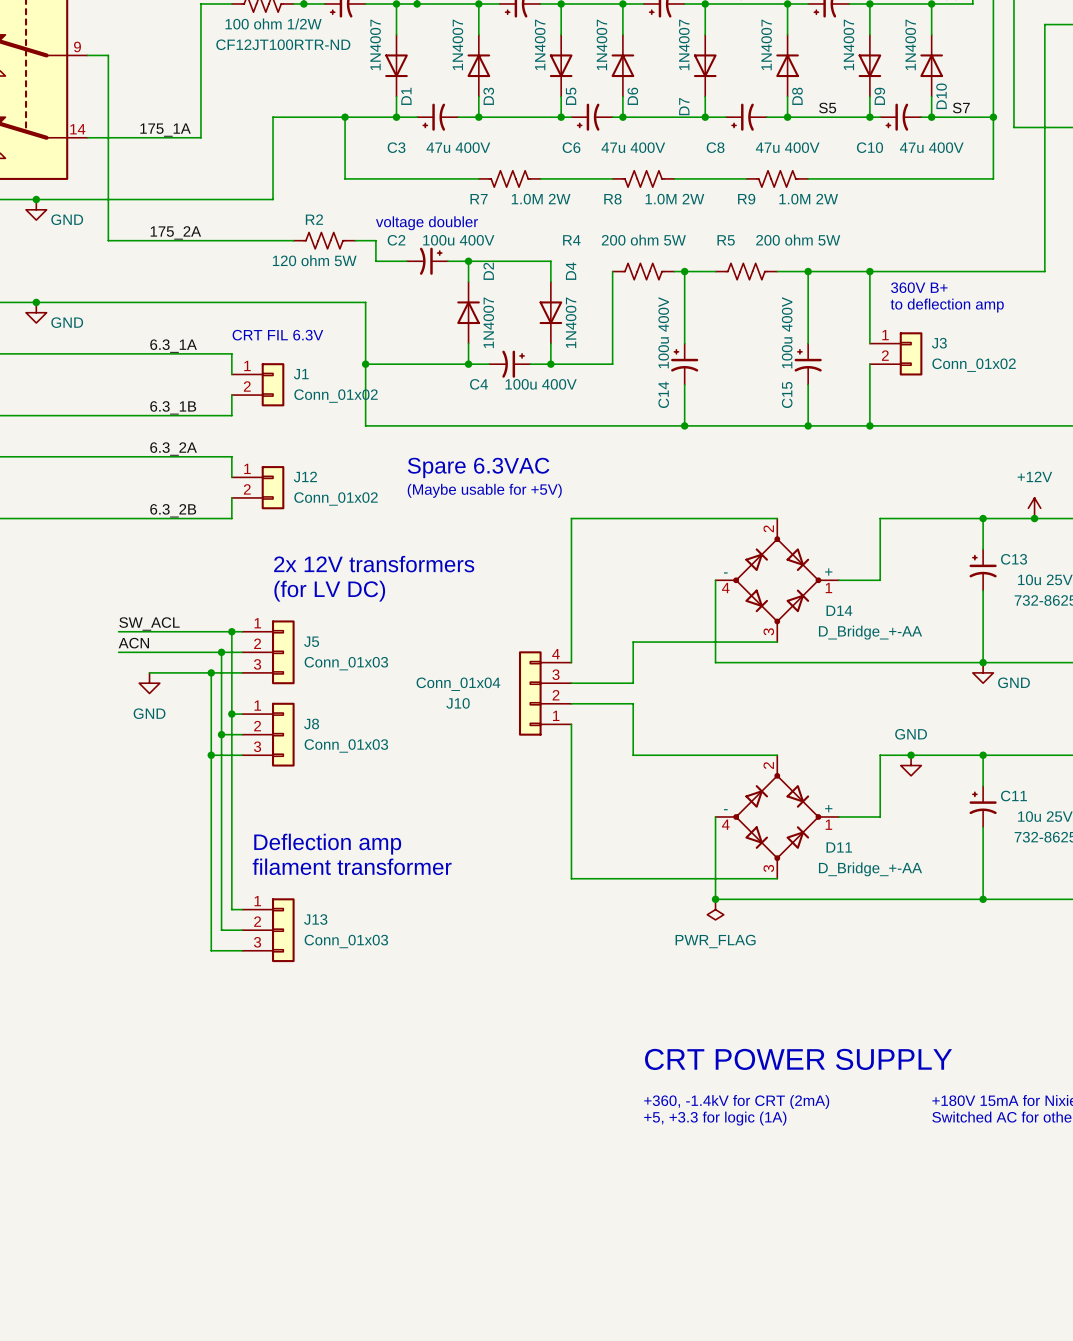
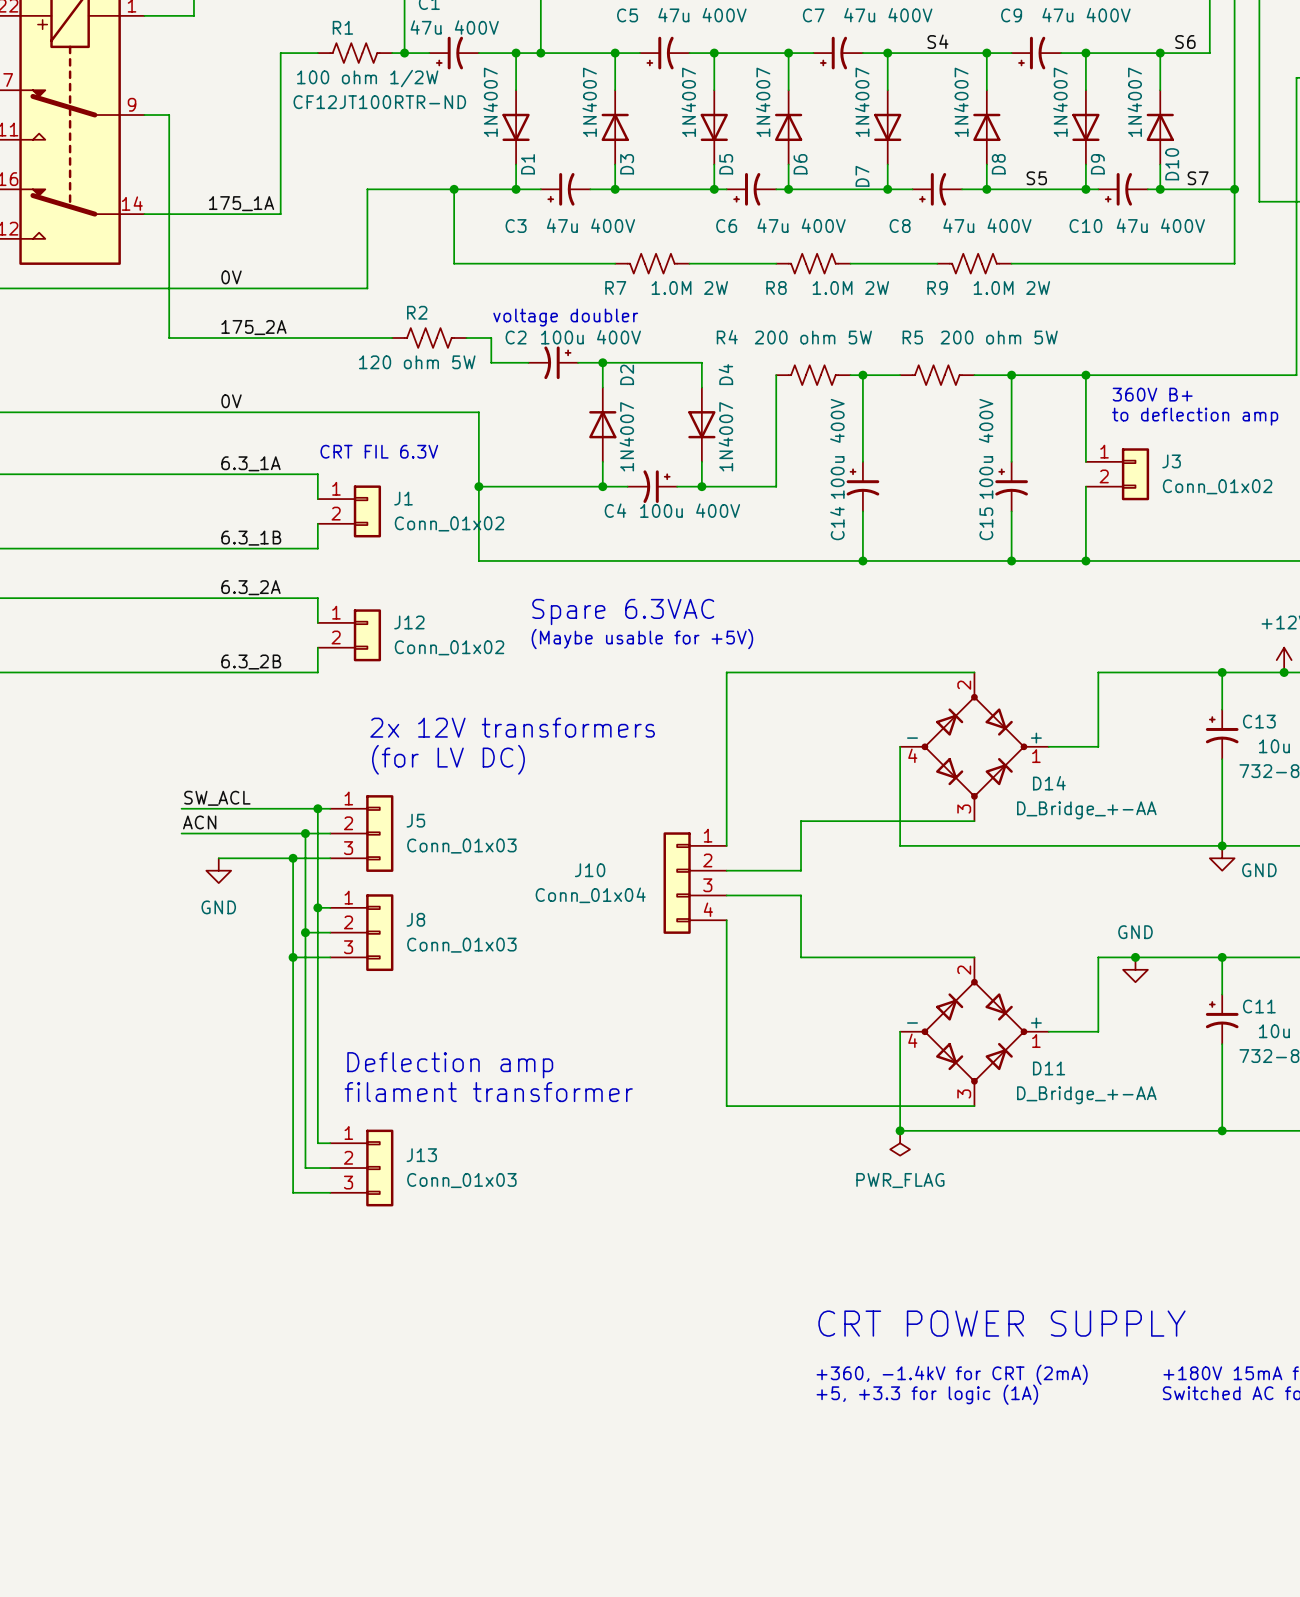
label: none -> 0V (231, 277)
junction: (36, 199) -> none
power symbol: GND (36, 209) -> none
label: none -> 0V (231, 401)
junction: (36, 302) -> none
power symbol: GND (36, 312) -> none
J10 flip: as is (530, 693) -> up-down (677, 883)

